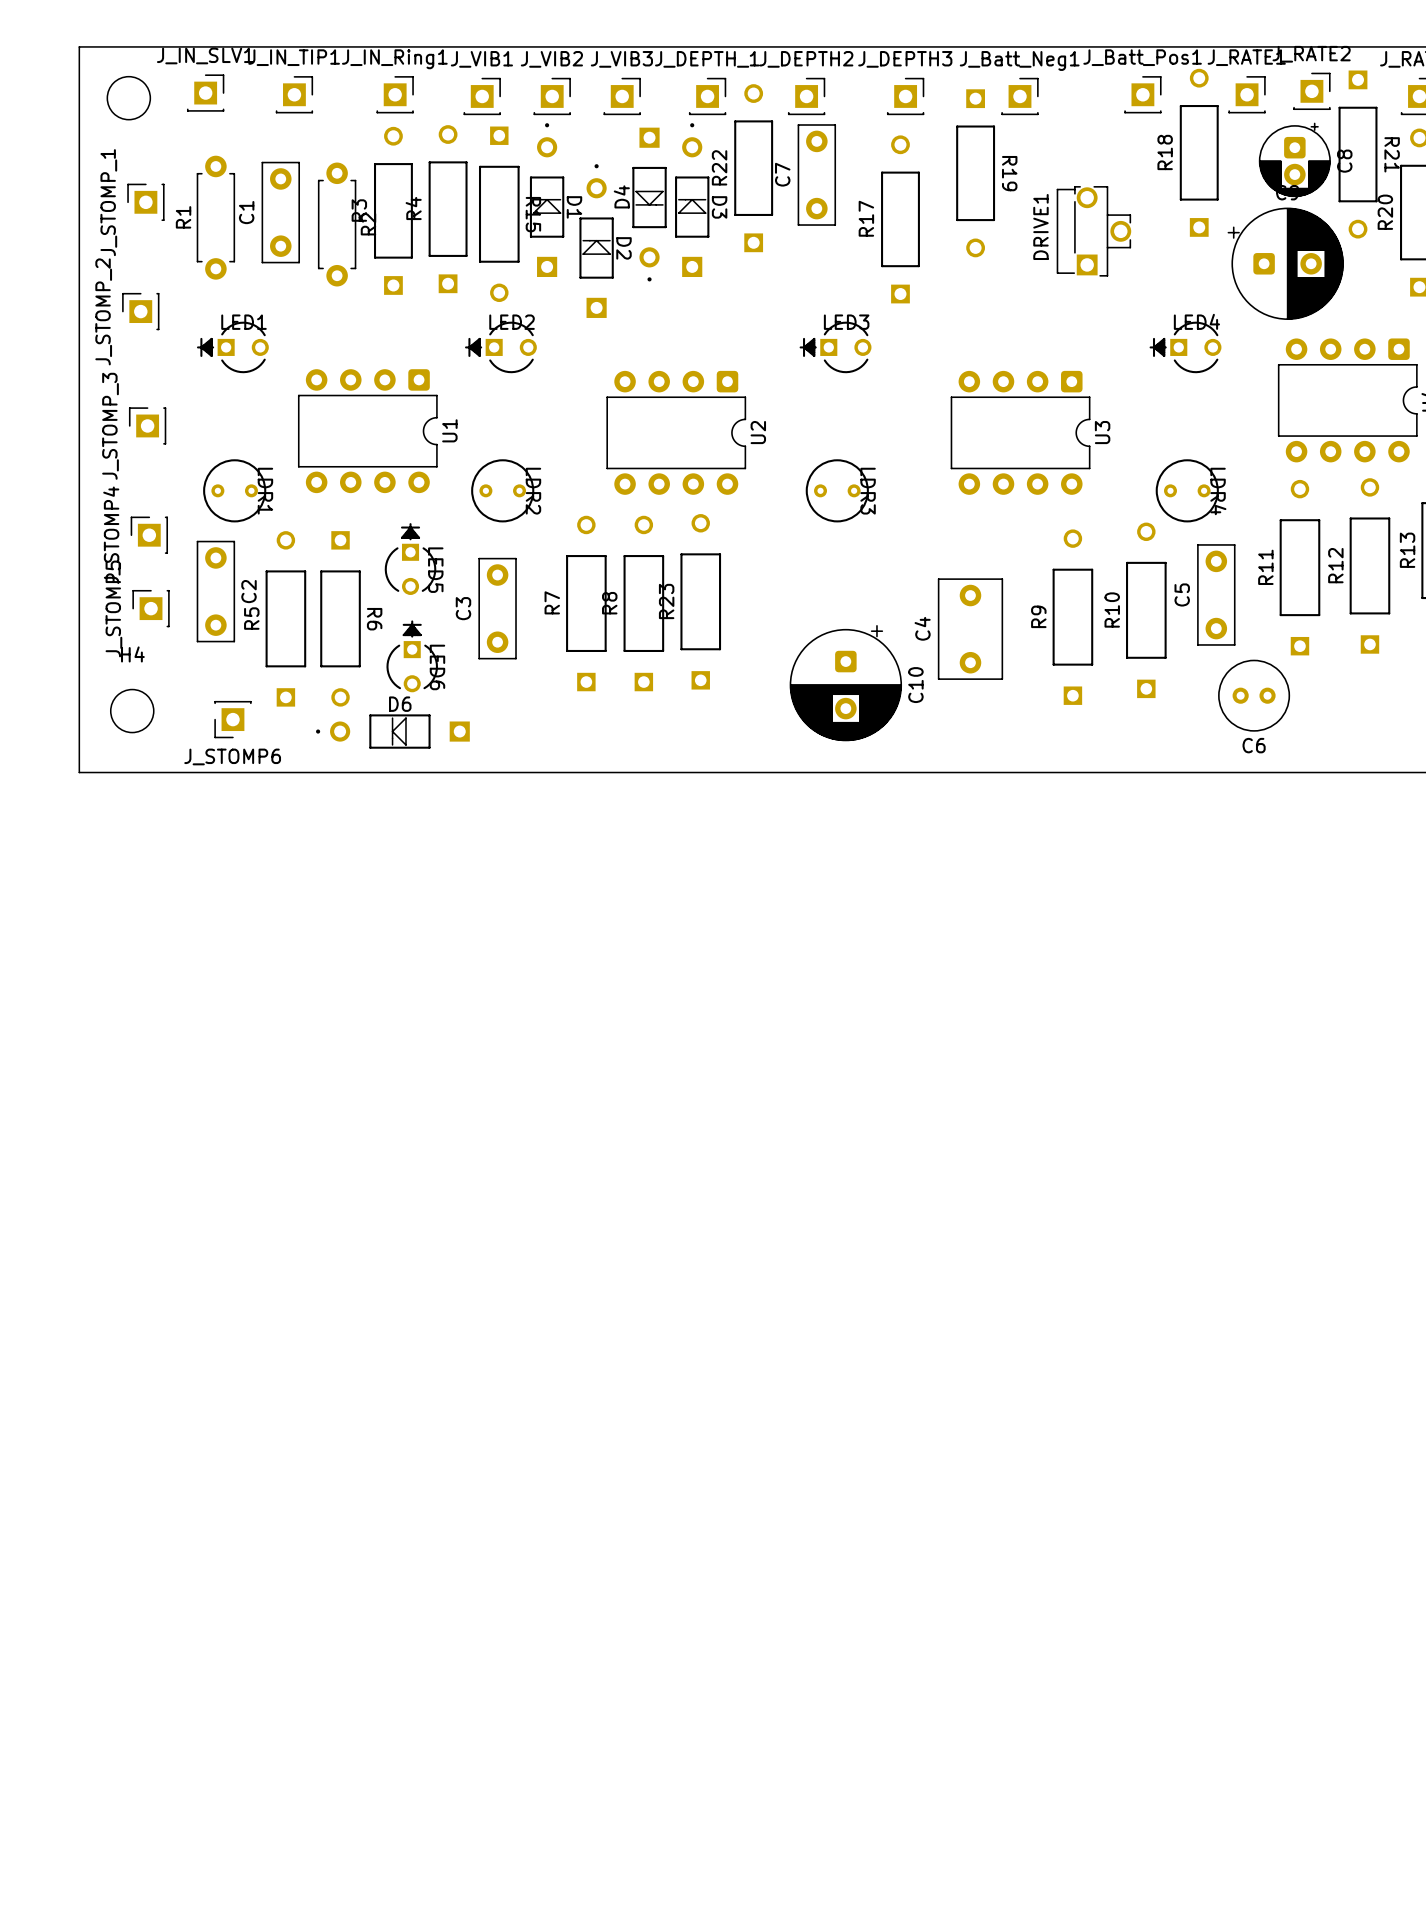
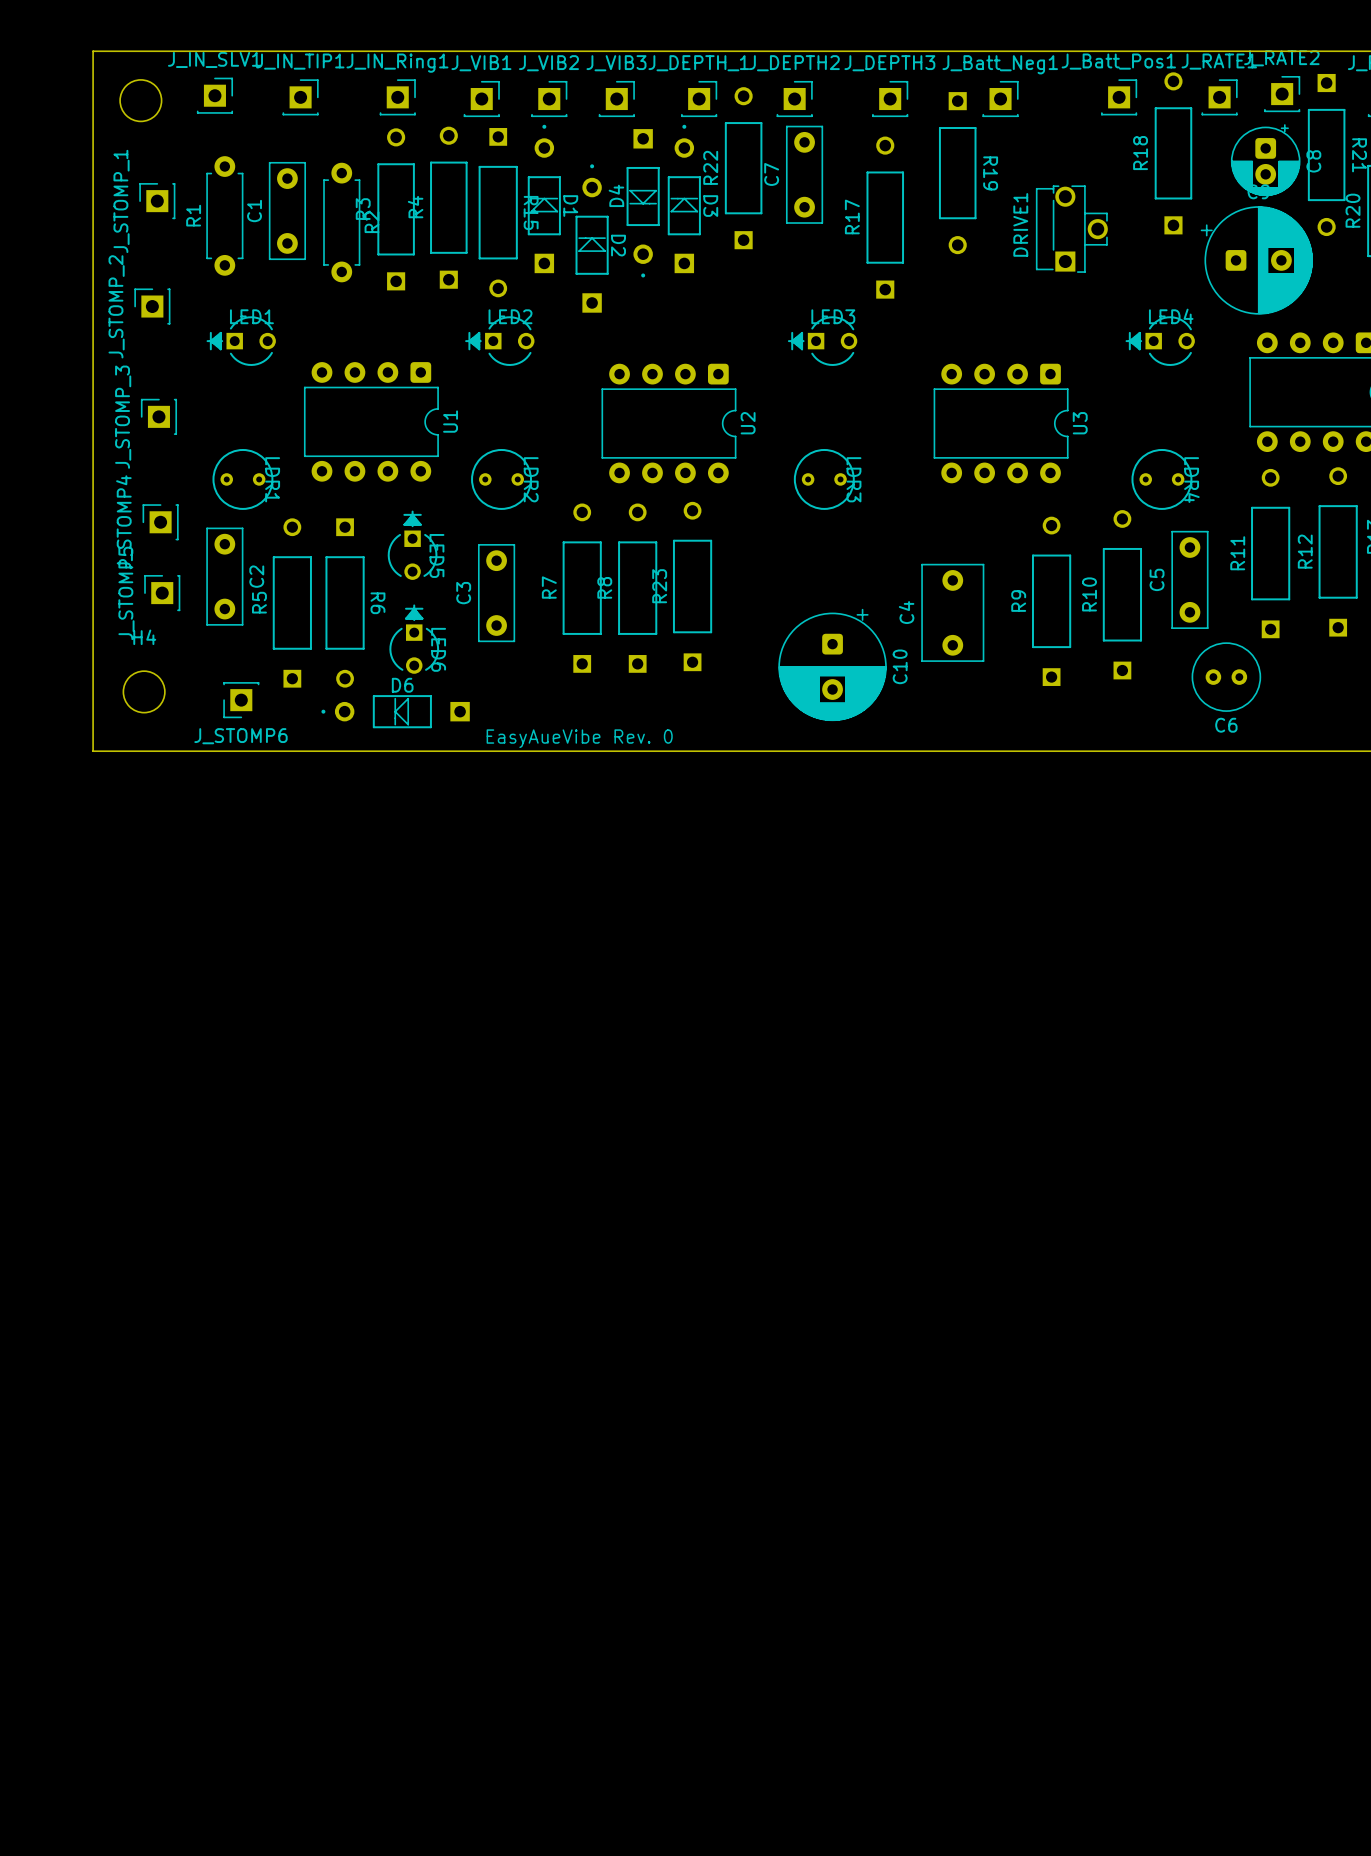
text: none -> EasyAueVibe Rev. 0 (579, 738)

